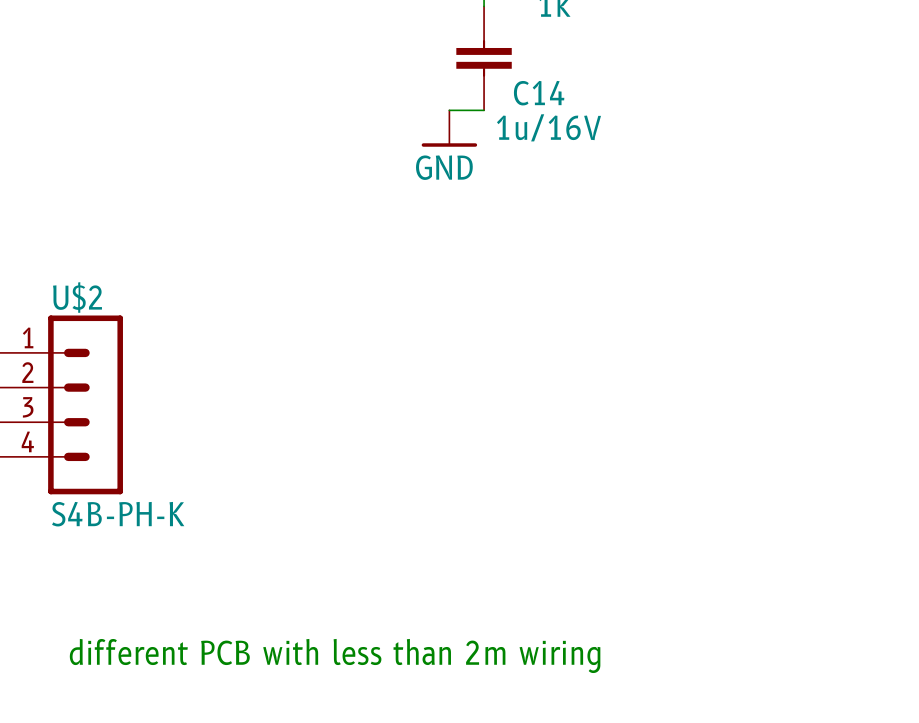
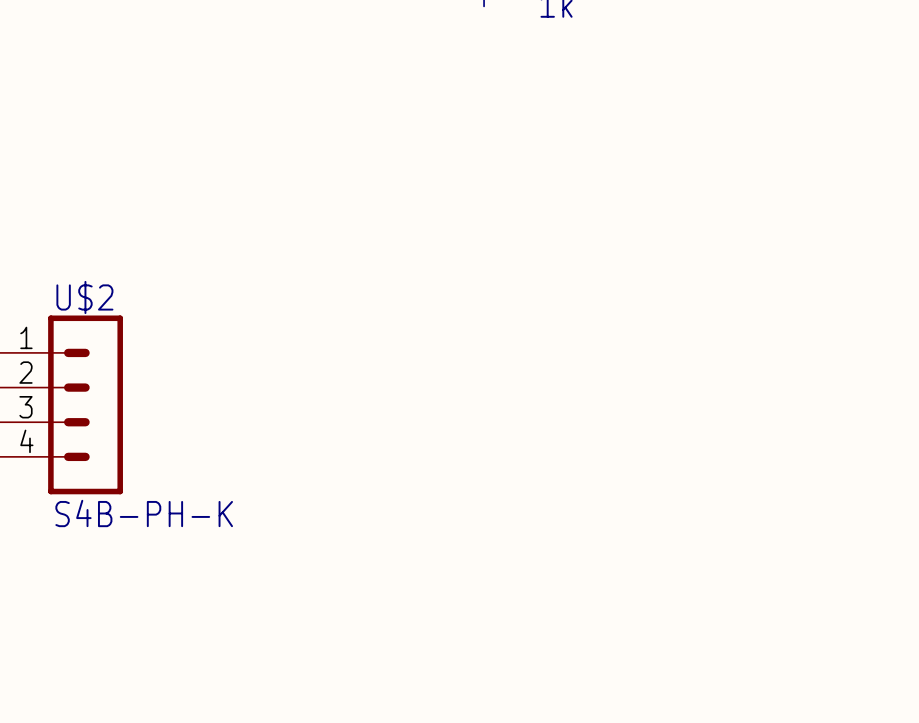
C14: 1u/16V (484, 58) -> none
wire: (449, 110) (484, 110) -> none
power symbol: GND (449, 128) -> none
text: different PCB with less than 2m wiring (335, 655) -> none

